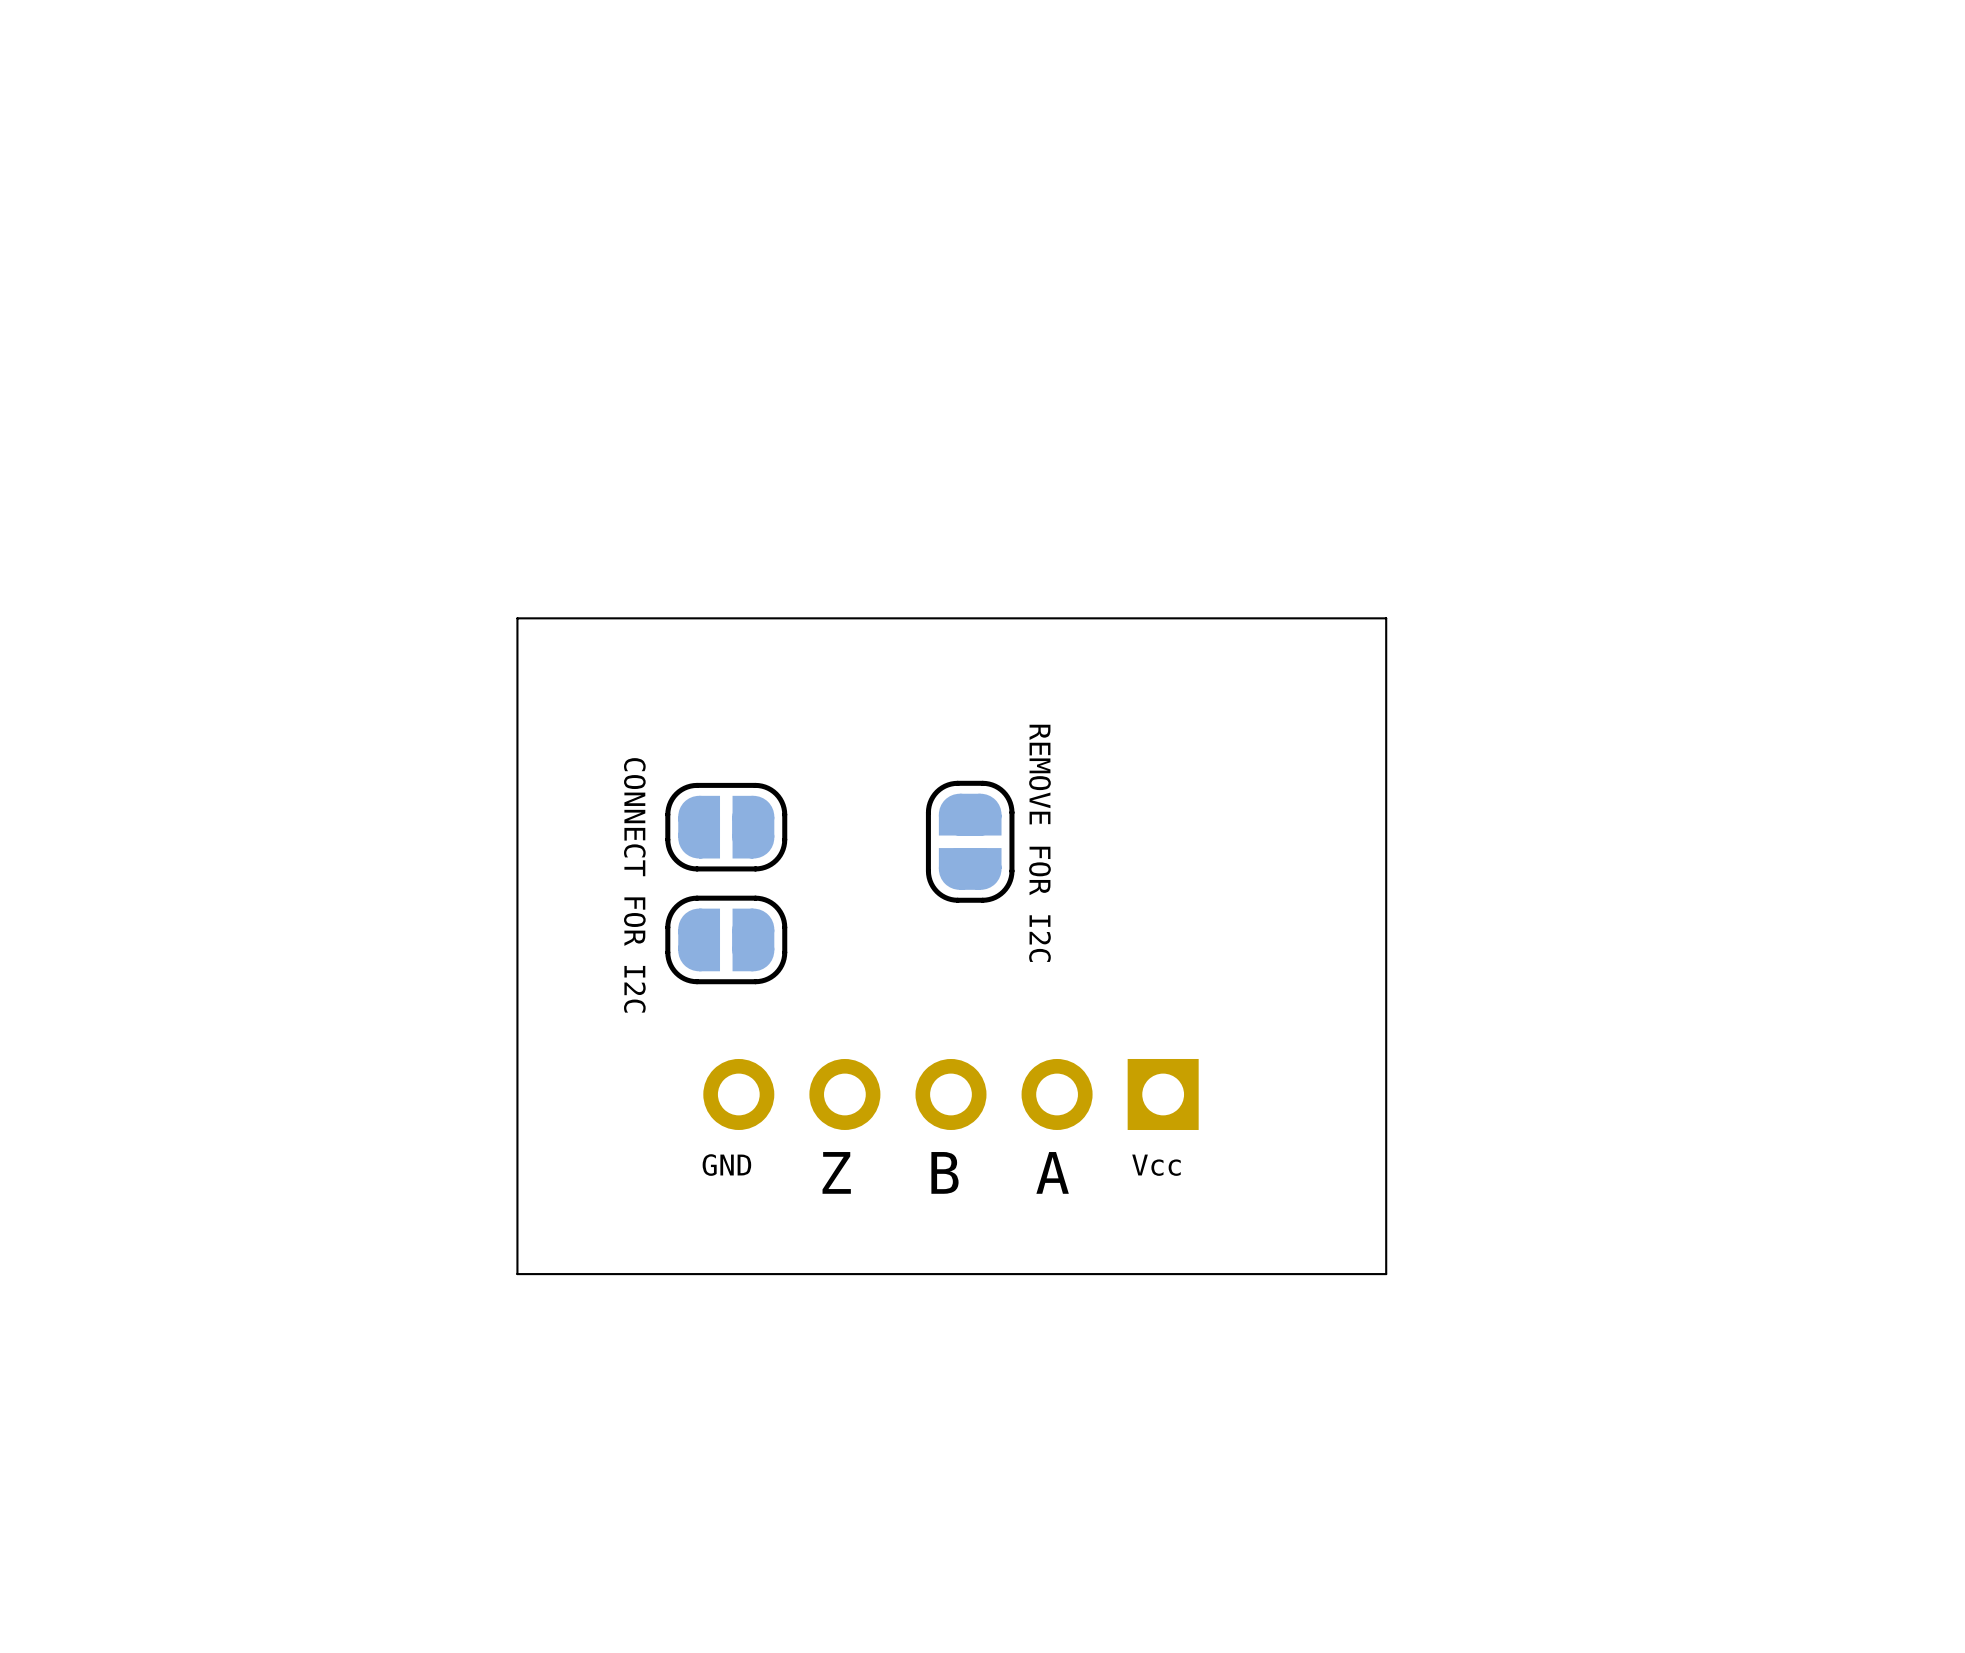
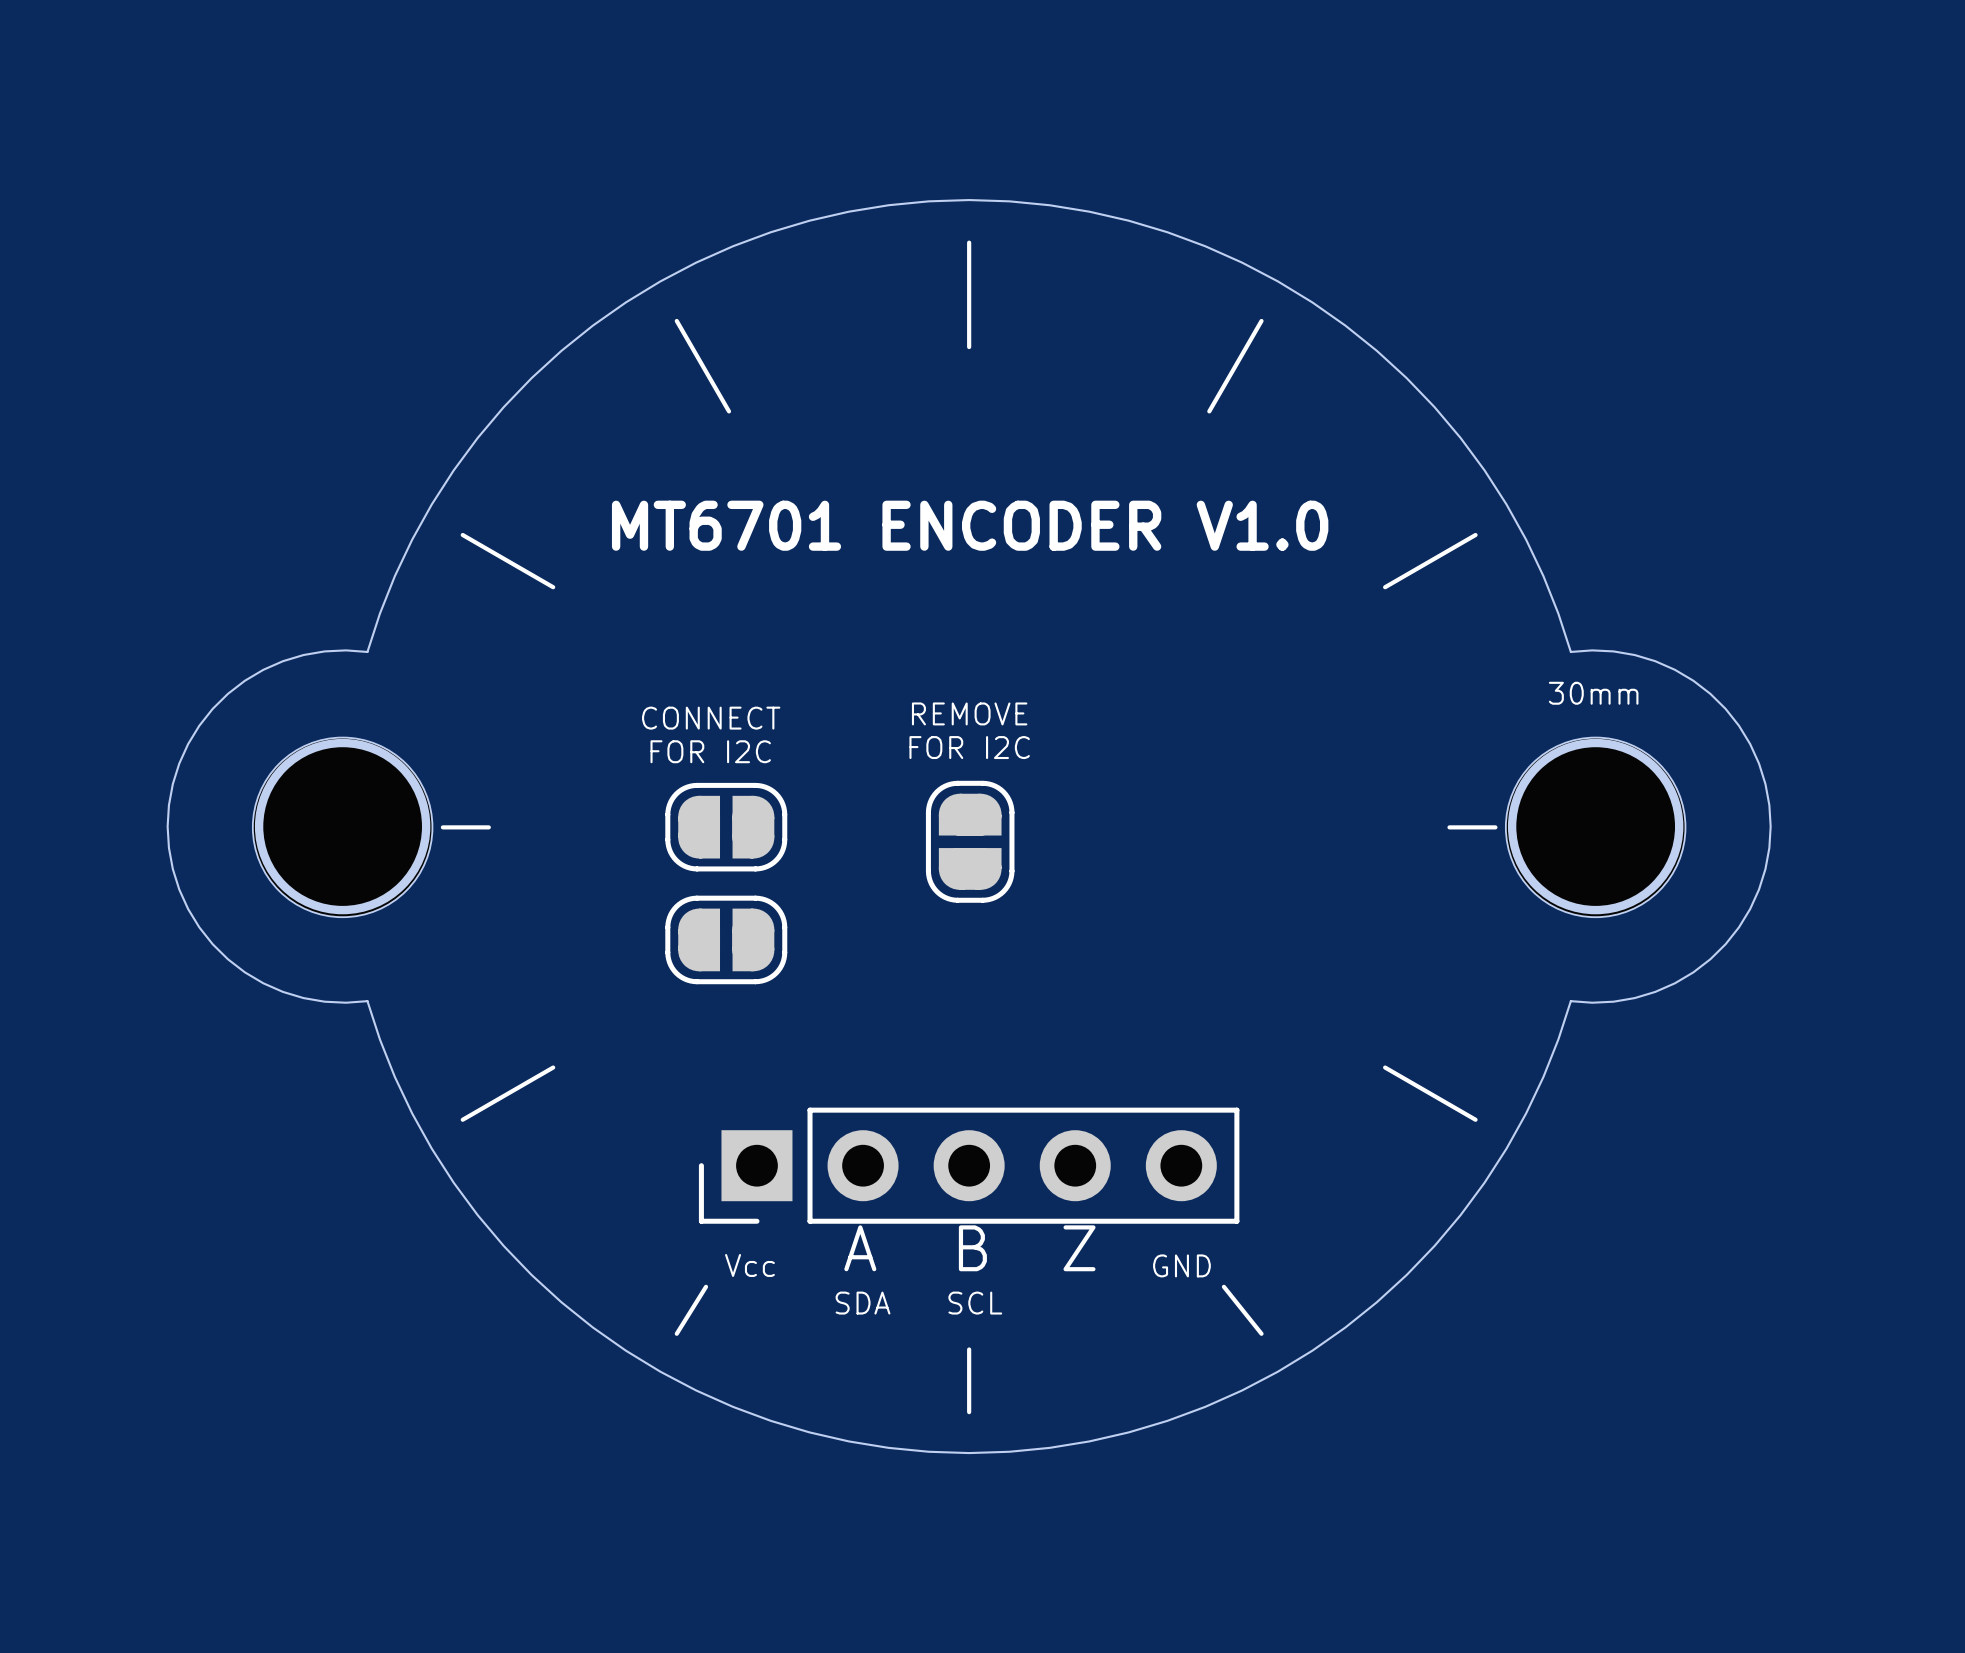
line: none -> (969, 242) (969, 347)
line: none -> (676, 320) (728, 411)
line: none -> (1261, 320) (1209, 411)
text: none -> MT6701 ENCODER V1.0 (970, 525)
line: none -> (462, 535) (553, 587)
line: none -> (1475, 535) (1385, 587)
board edge: (1386, 618) (517, 618) (517, 1274) (1386, 1274) (1386, 618) -> none
board edge: none -> (1570, 651) (1558, 613) (1526, 539) (1506, 504) (1460, 438) (1434, 407) (1376, 350) (1312, 302) (1242, 262) (1205, 246) (1167, 232) (1089, 211) (1009, 201) (928, 201) (888, 205) (848, 211) (770, 232) (696, 262) (625, 302) (561, 350) (503, 407) (477, 438) (431, 504) (394, 576) (367, 651) (324, 651) (282, 661) (244, 680) (227, 693) (199, 725) (188, 744) (172, 784) (167, 826) (168, 847) (172, 869) (188, 909) (212, 944) (244, 972) (282, 991) (303, 998) (324, 1001) (367, 1001) (379, 1039) (412, 1113) (453, 1182) (477, 1215) (503, 1245) (561, 1302) (625, 1350) (696, 1390) (732, 1406) (770, 1420) (848, 1441) (888, 1447) (969, 1453) (1049, 1447) (1128, 1432) (1205, 1406) (1277, 1371) (1345, 1327) (1376, 1302) (1434, 1245) (1484, 1182) (1526, 1113) (1558, 1039) (1570, 1001) (1613, 1001) (1655, 991) (1693, 972) (1710, 959) (1738, 927) (1750, 909) (1765, 869) (1770, 826) (1765, 784) (1750, 744) (1738, 725) (1710, 693) (1693, 680) (1655, 661) (1613, 651) (1570, 651)
text: none -> 30mm (1593, 693)
text: none -> REMOVE (969, 713)
text: none -> CONNECT (711, 718)
round board edge: none -> [254, 738, 431, 915]
round board edge: none -> [1507, 738, 1684, 915]
part: none -> (342, 827)
line: none -> (488, 827) (442, 827)
line: none -> (1495, 827) (1449, 827)
part: none -> (1595, 827)
text: REMOVE FOR I2C (1039, 843) -> FOR I2C (969, 747)
text: CONNECT FOR I2C (634, 885) -> FOR I2C (710, 751)
line: none -> (553, 1067) (462, 1119)
line: none -> (1385, 1067) (1475, 1119)
part side: top (950, 1094) -> bottom (969, 1165)
text position: GND (726, 1165) -> GND (1181, 1265)
text position: Vcc (1156, 1165) -> Vcc (749, 1265)
text position: Z (836, 1172) -> Z (1079, 1248)
text position: B (944, 1172) -> B (972, 1248)
text position: A (1052, 1172) -> A (860, 1248)
line: none -> (706, 1286) (676, 1333)
line: none -> (1223, 1286) (1261, 1333)
text: none -> SDA (863, 1303)
text: none -> SCL (975, 1303)
line: none -> (969, 1349) (969, 1412)

